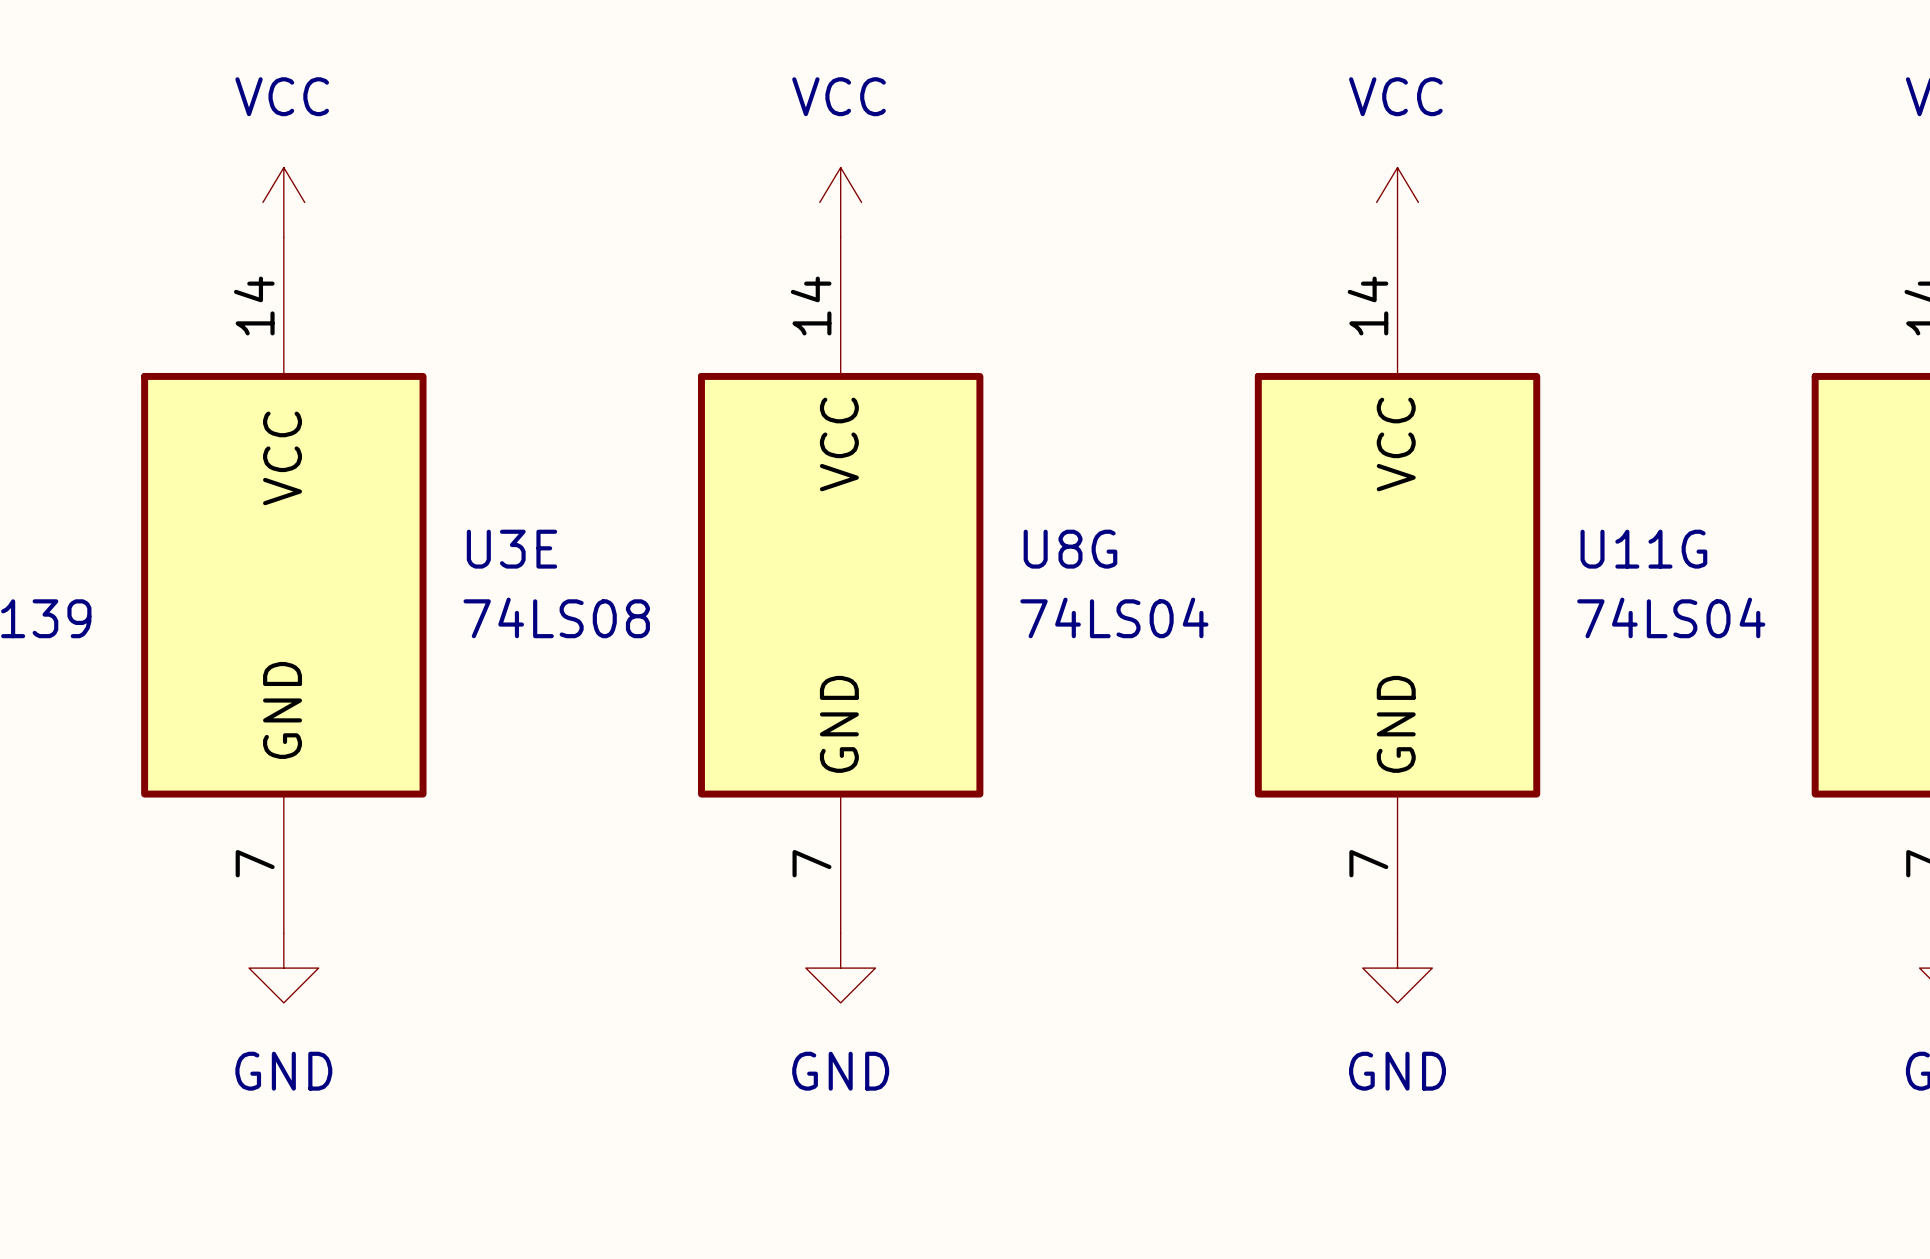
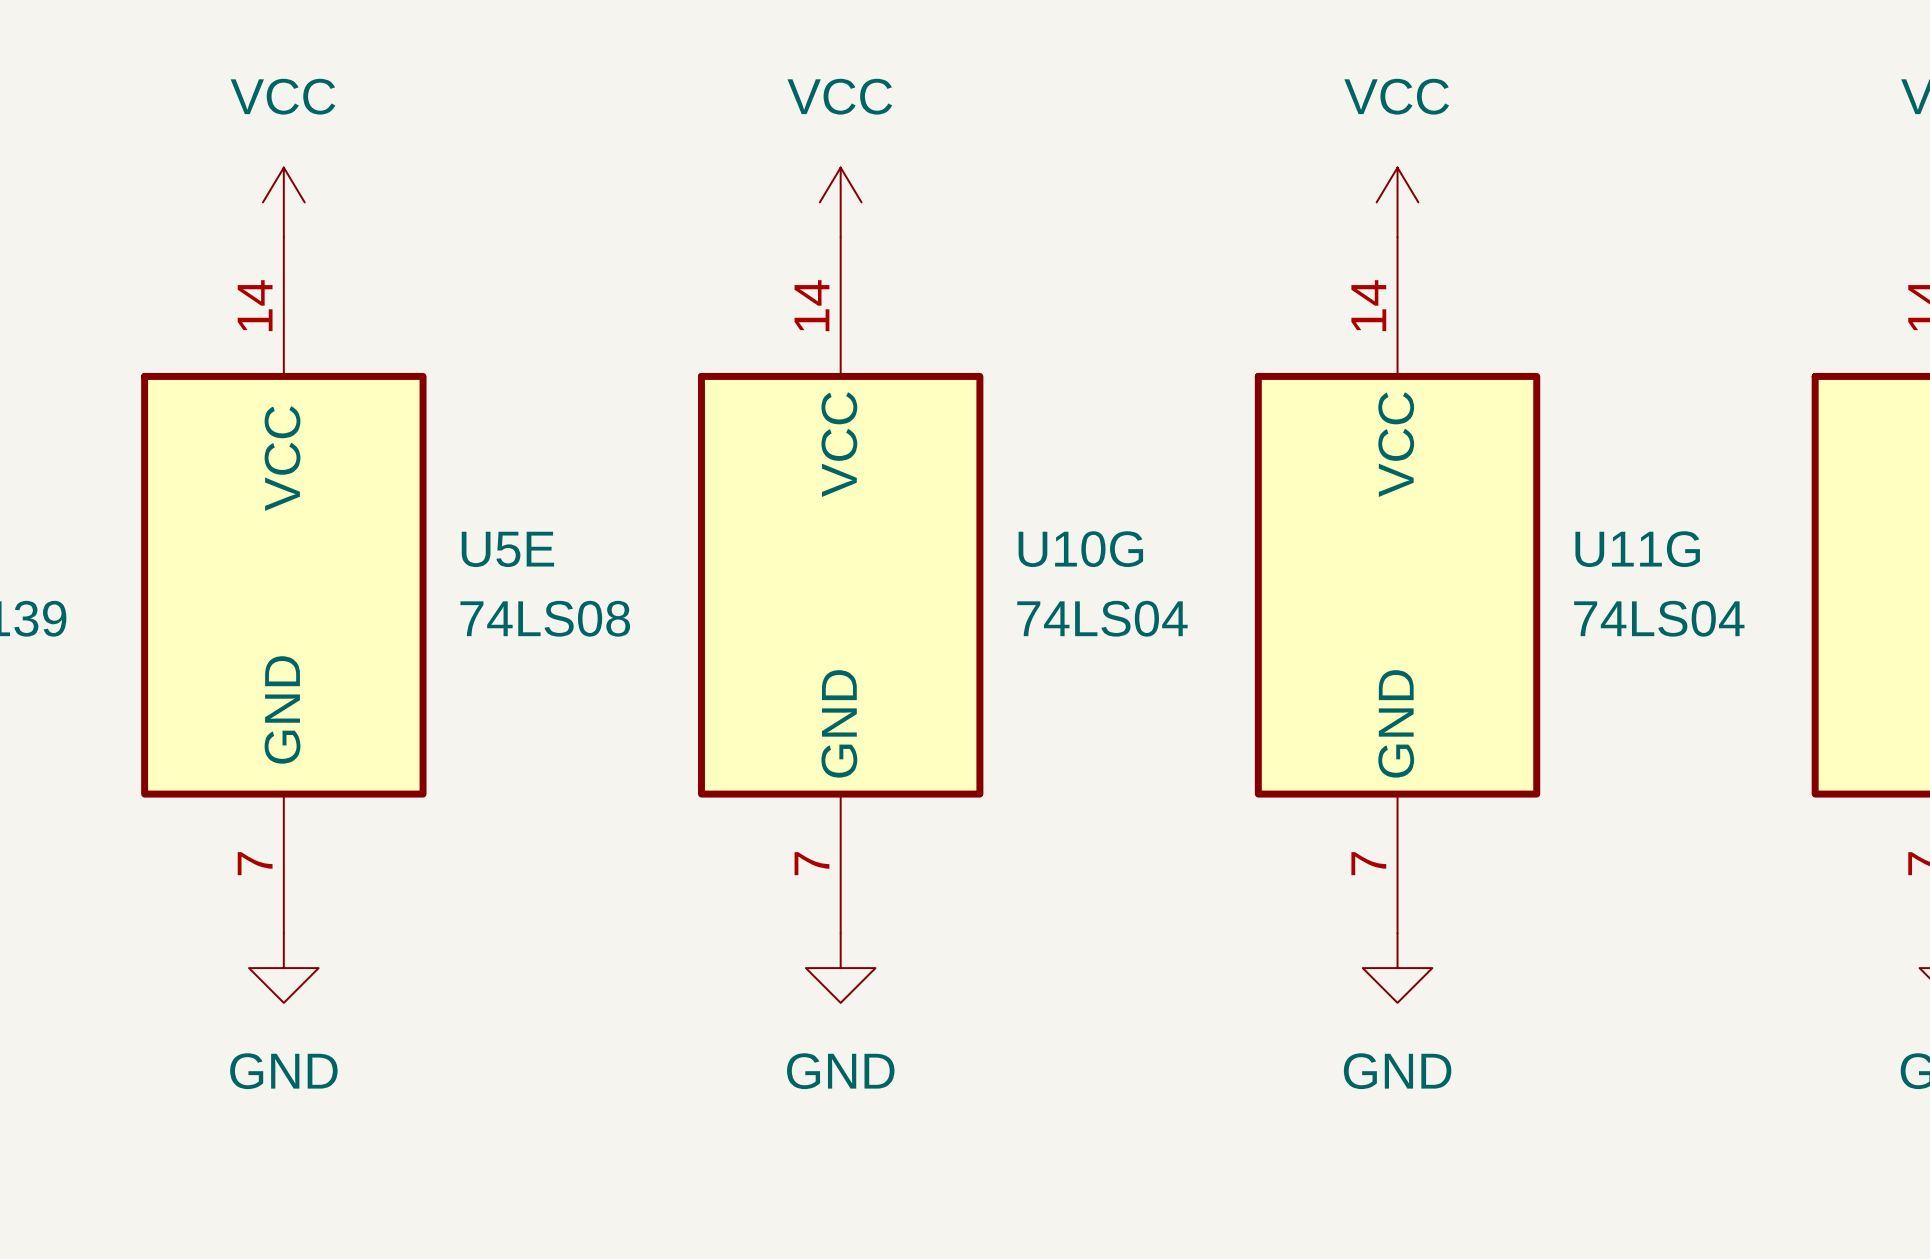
U3E name: U3E (511, 549) -> U5E (507, 549)
U8G name: U8G (1070, 549) -> U10G (1080, 549)

